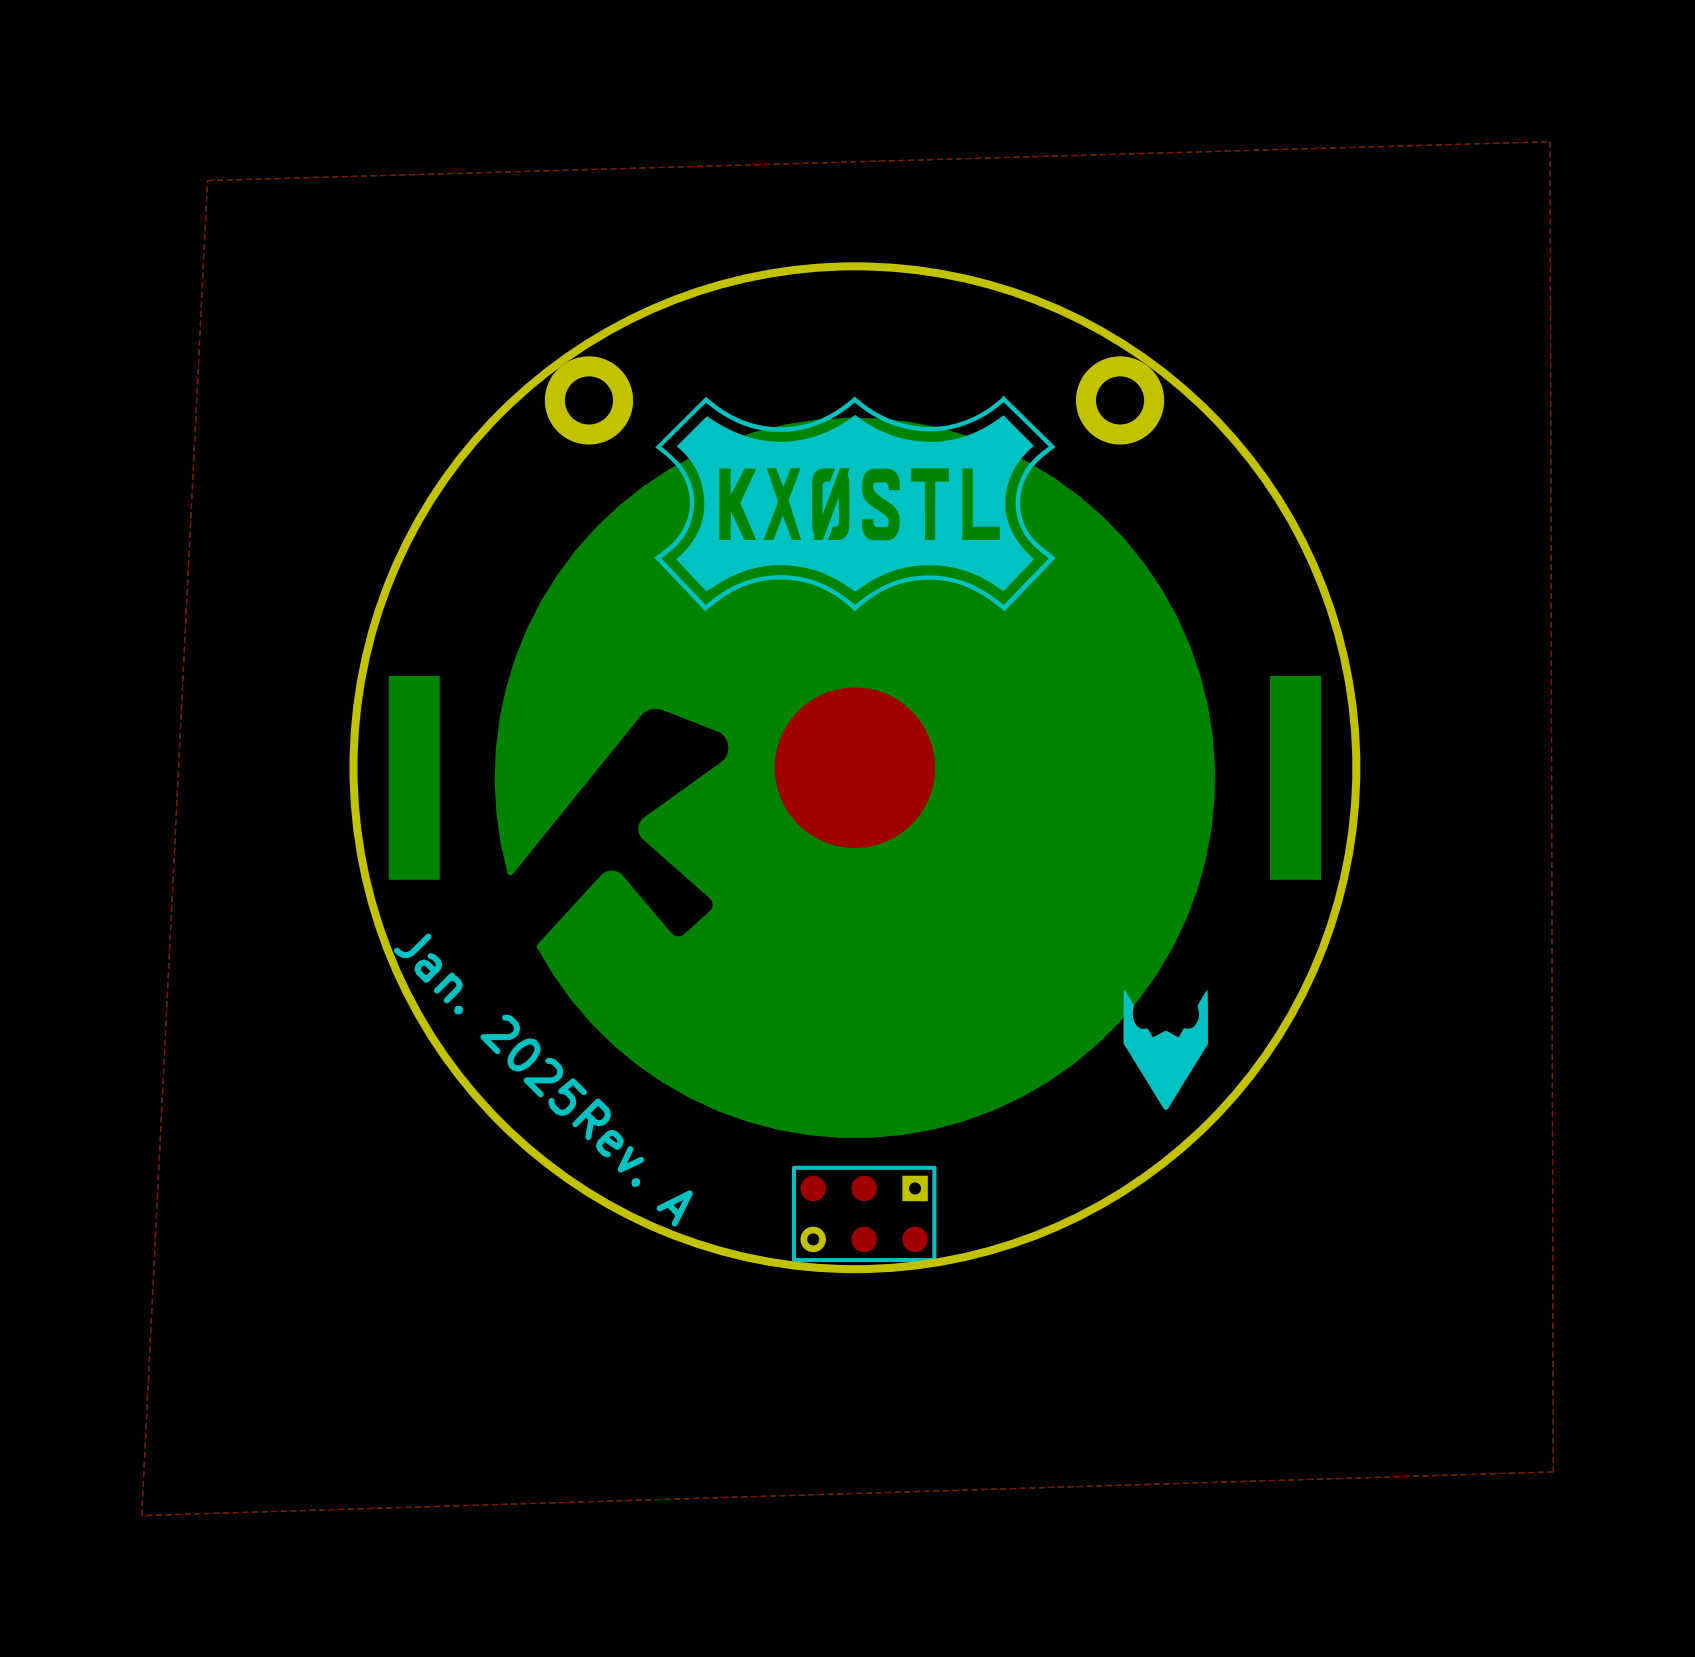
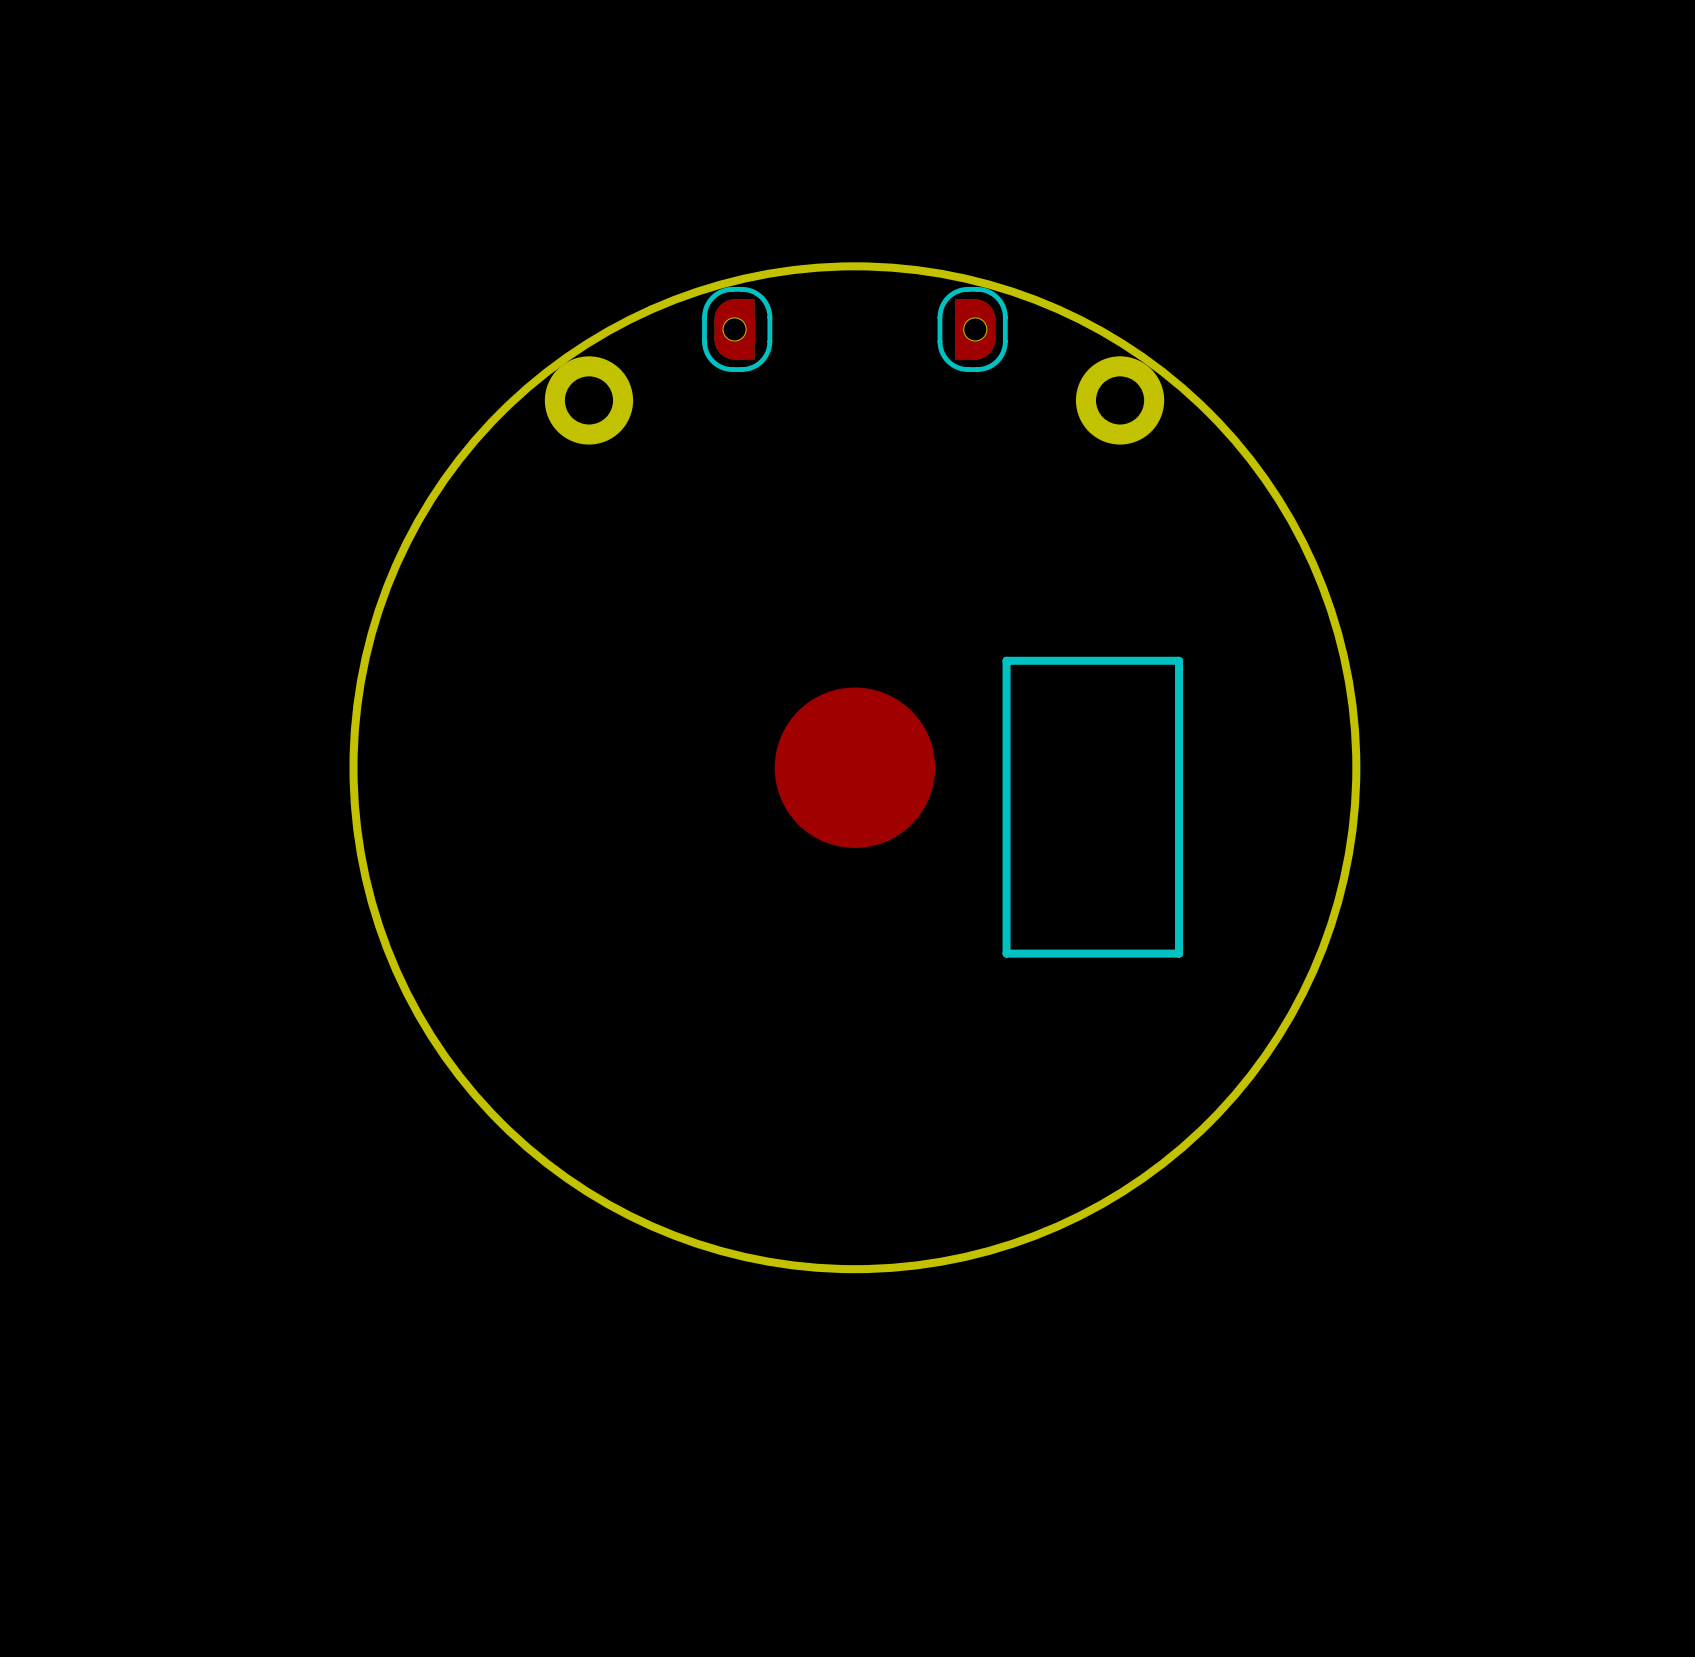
top zone outline: (1550, 141) (207, 180) (141, 1515) (1553, 1471) (1550, 141) -> none
part: none -> (737, 329)
part: none -> (972, 329)
drawing: [654, 395, 1056, 612] -> none
line: none -> (1006, 660) (1179, 660) (1179, 953) (1006, 953) (1006, 660)
part: (854, 777) -> none
drawing: [1123, 989, 1208, 1111] -> none
text: Jan. 2025 (490, 1024) -> none
text: Rev. A (632, 1162) -> none
part: (864, 1213) -> none

